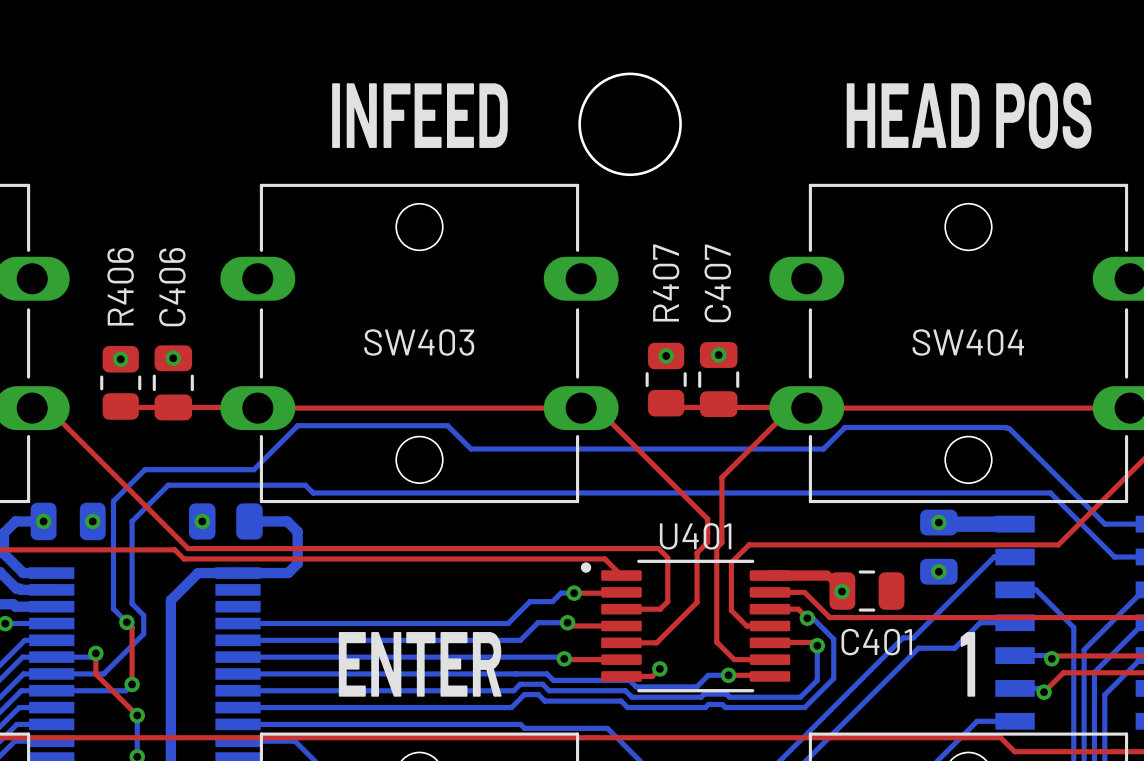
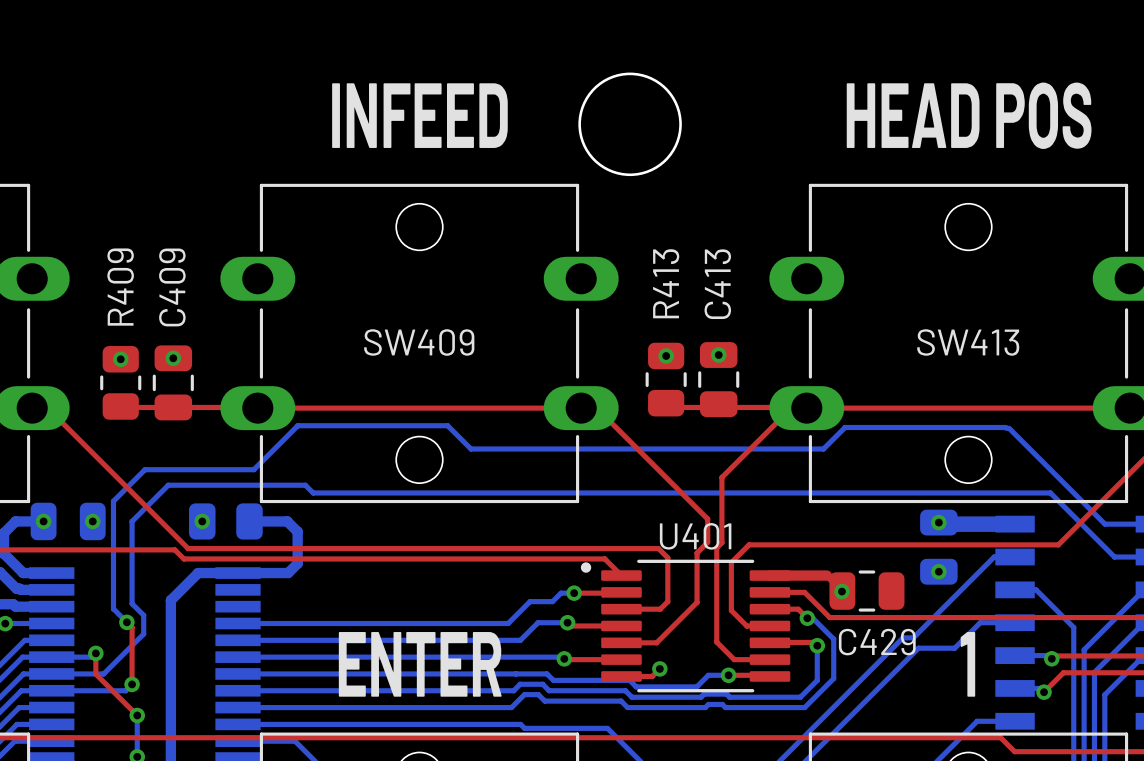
R407 name: R407 (666, 282) -> R413 (666, 283)
C407 name: C407 (717, 283) -> C413 (717, 284)
R406 name: R406 (120, 286) -> R409 (120, 287)
C406 name: C406 (172, 287) -> C409 (172, 287)
SW403 name: SW403 (419, 342) -> SW409 (419, 342)
SW404 name: SW404 (968, 342) -> SW413 (968, 342)
C401 name: C401 (876, 642) -> C429 (877, 642)

